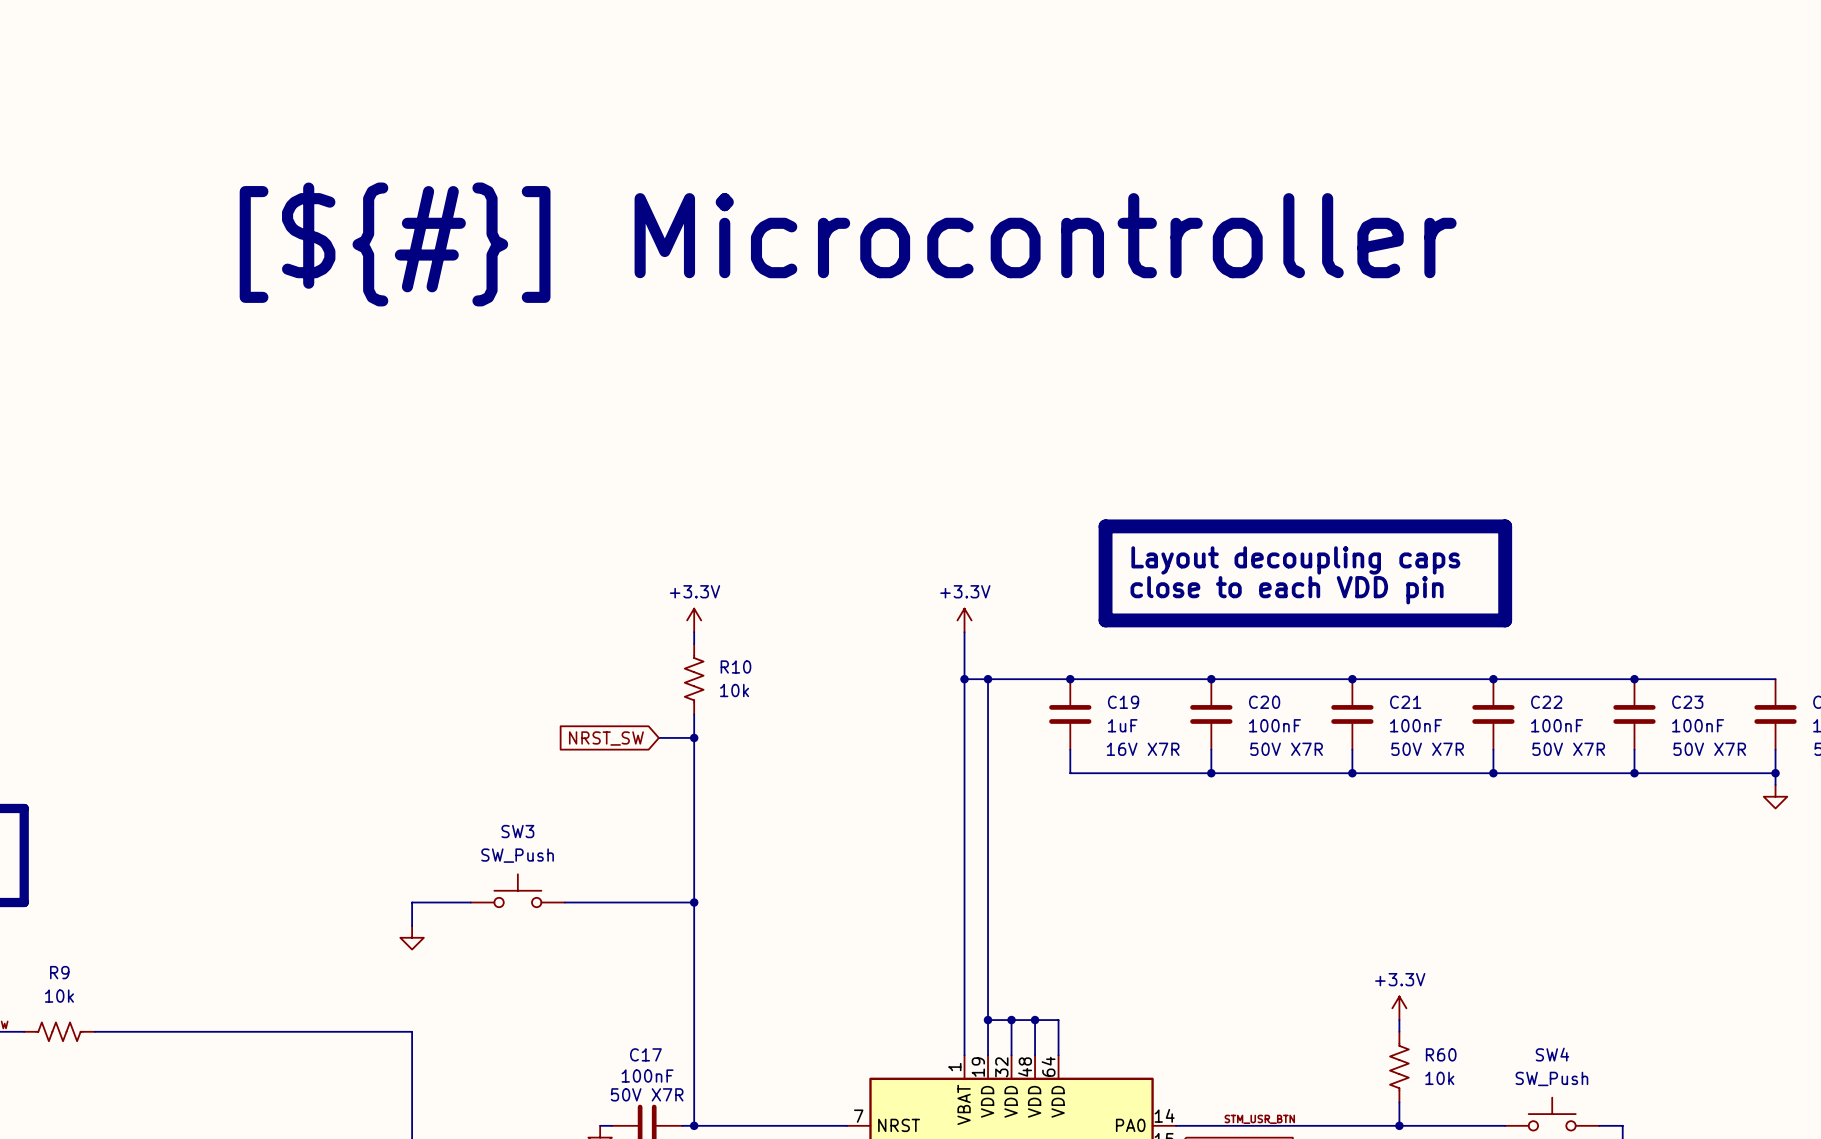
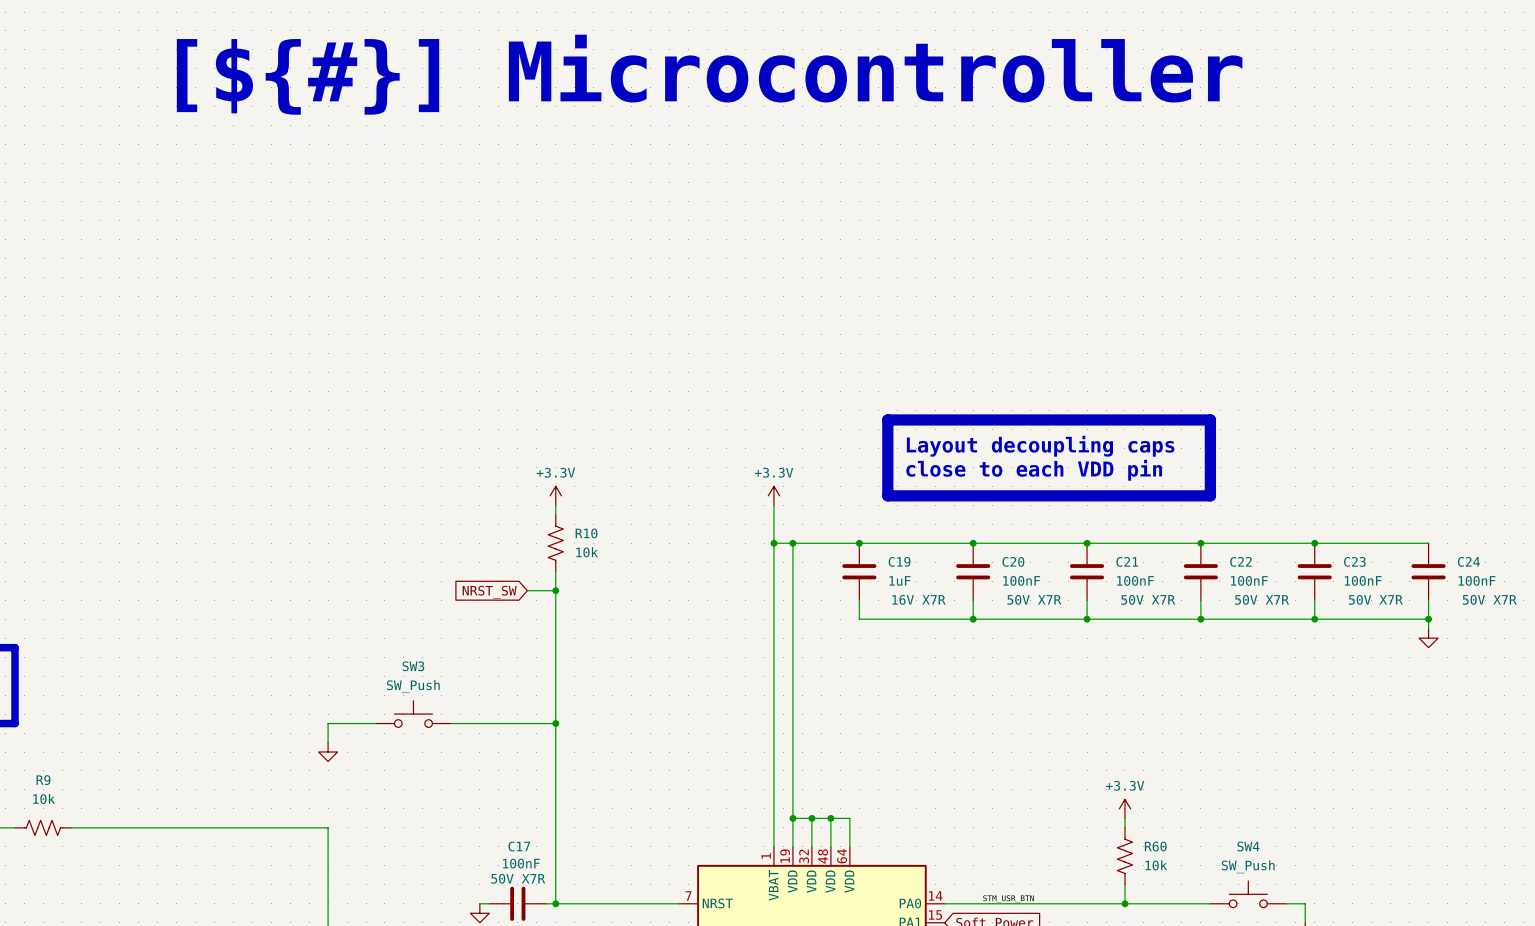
text position: [${#}] Microcontroller (848, 244) -> [${#}] Microcontroller (709, 74)

